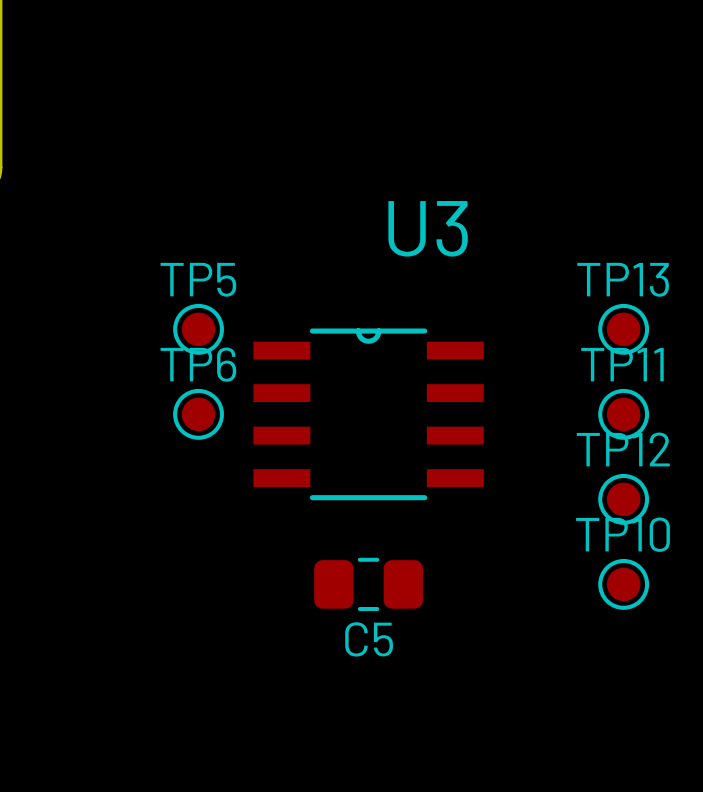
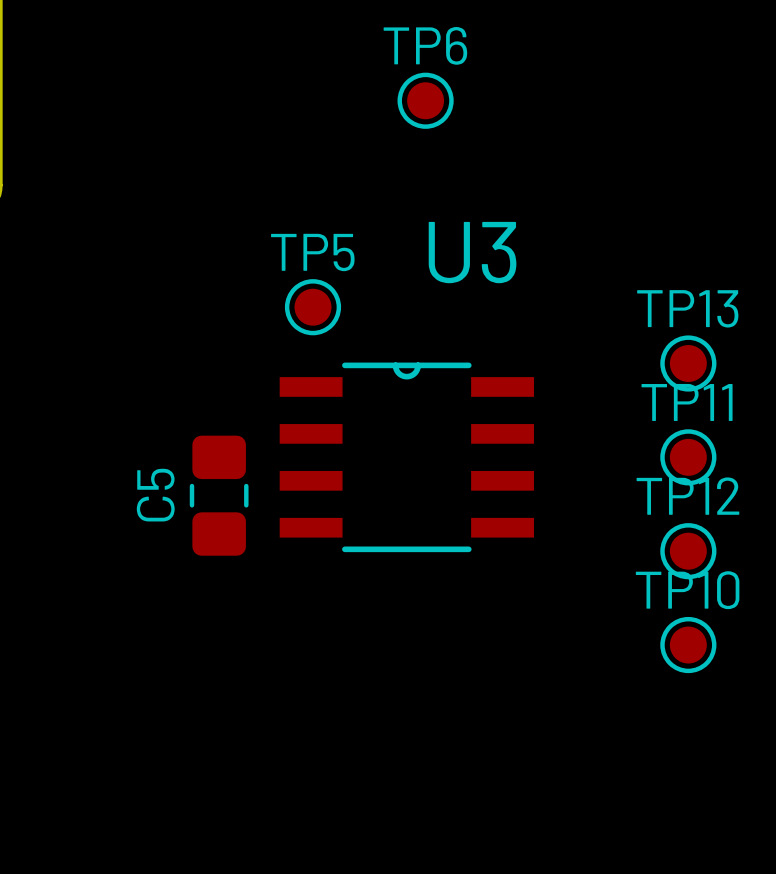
TP5 position: (198, 329) -> (312, 307)
TP6 position: (198, 414) -> (425, 100)
C5 rotation: 0° (368, 584) -> 90° clockwise (219, 495)
C5 position: (368, 584) -> (219, 495)

